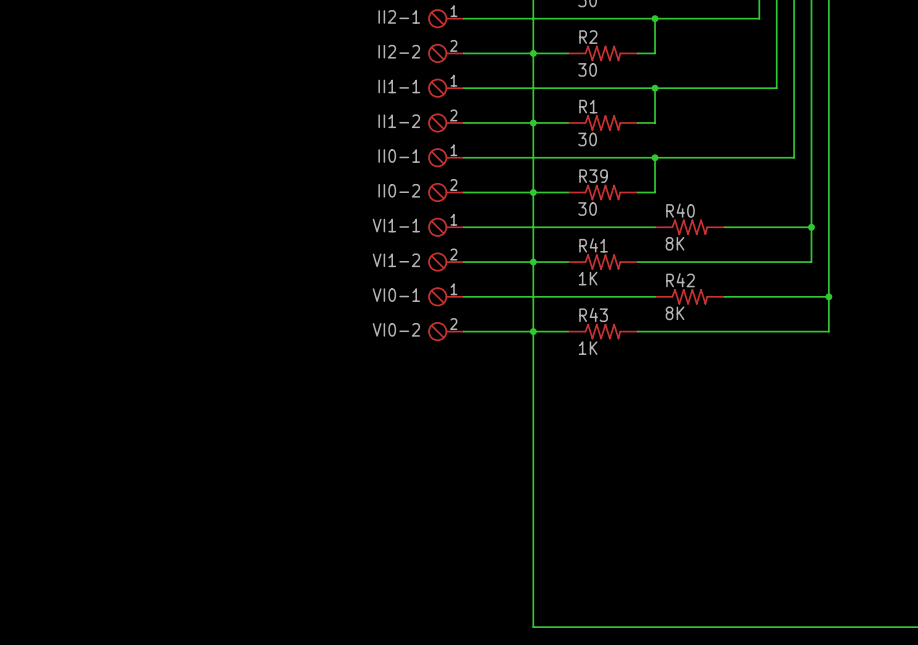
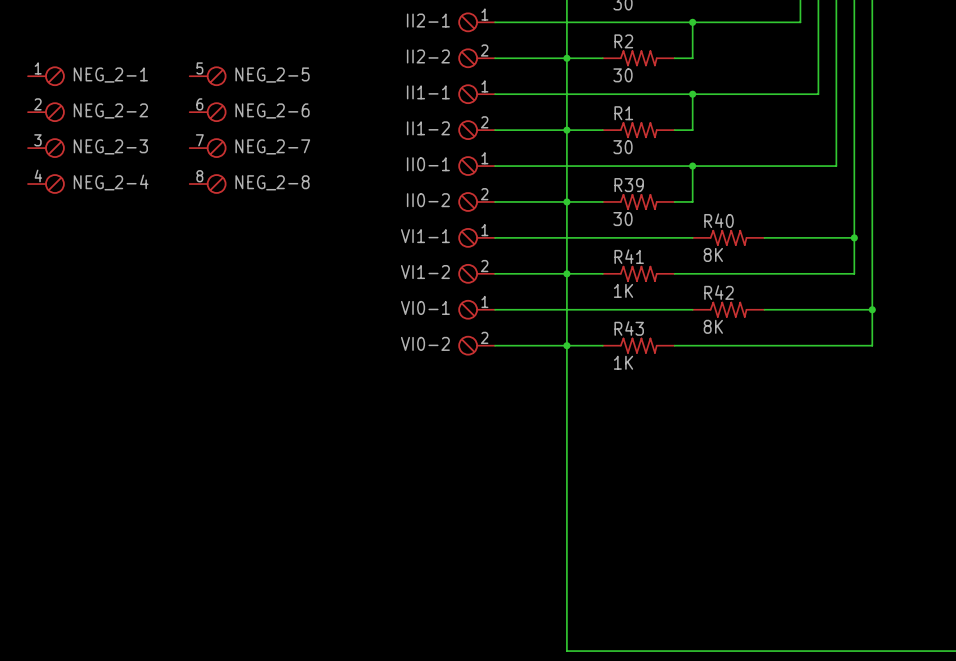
NEG_2-1: none -> (46, 76)
NEG_2-5: none -> (208, 76)
NEG_2-2: none -> (46, 112)
NEG_2-6: none -> (208, 112)
NEG_2-3: none -> (46, 148)
NEG_2-7: none -> (208, 148)
NEG_2-4: none -> (46, 184)
NEG_2-8: none -> (208, 184)

